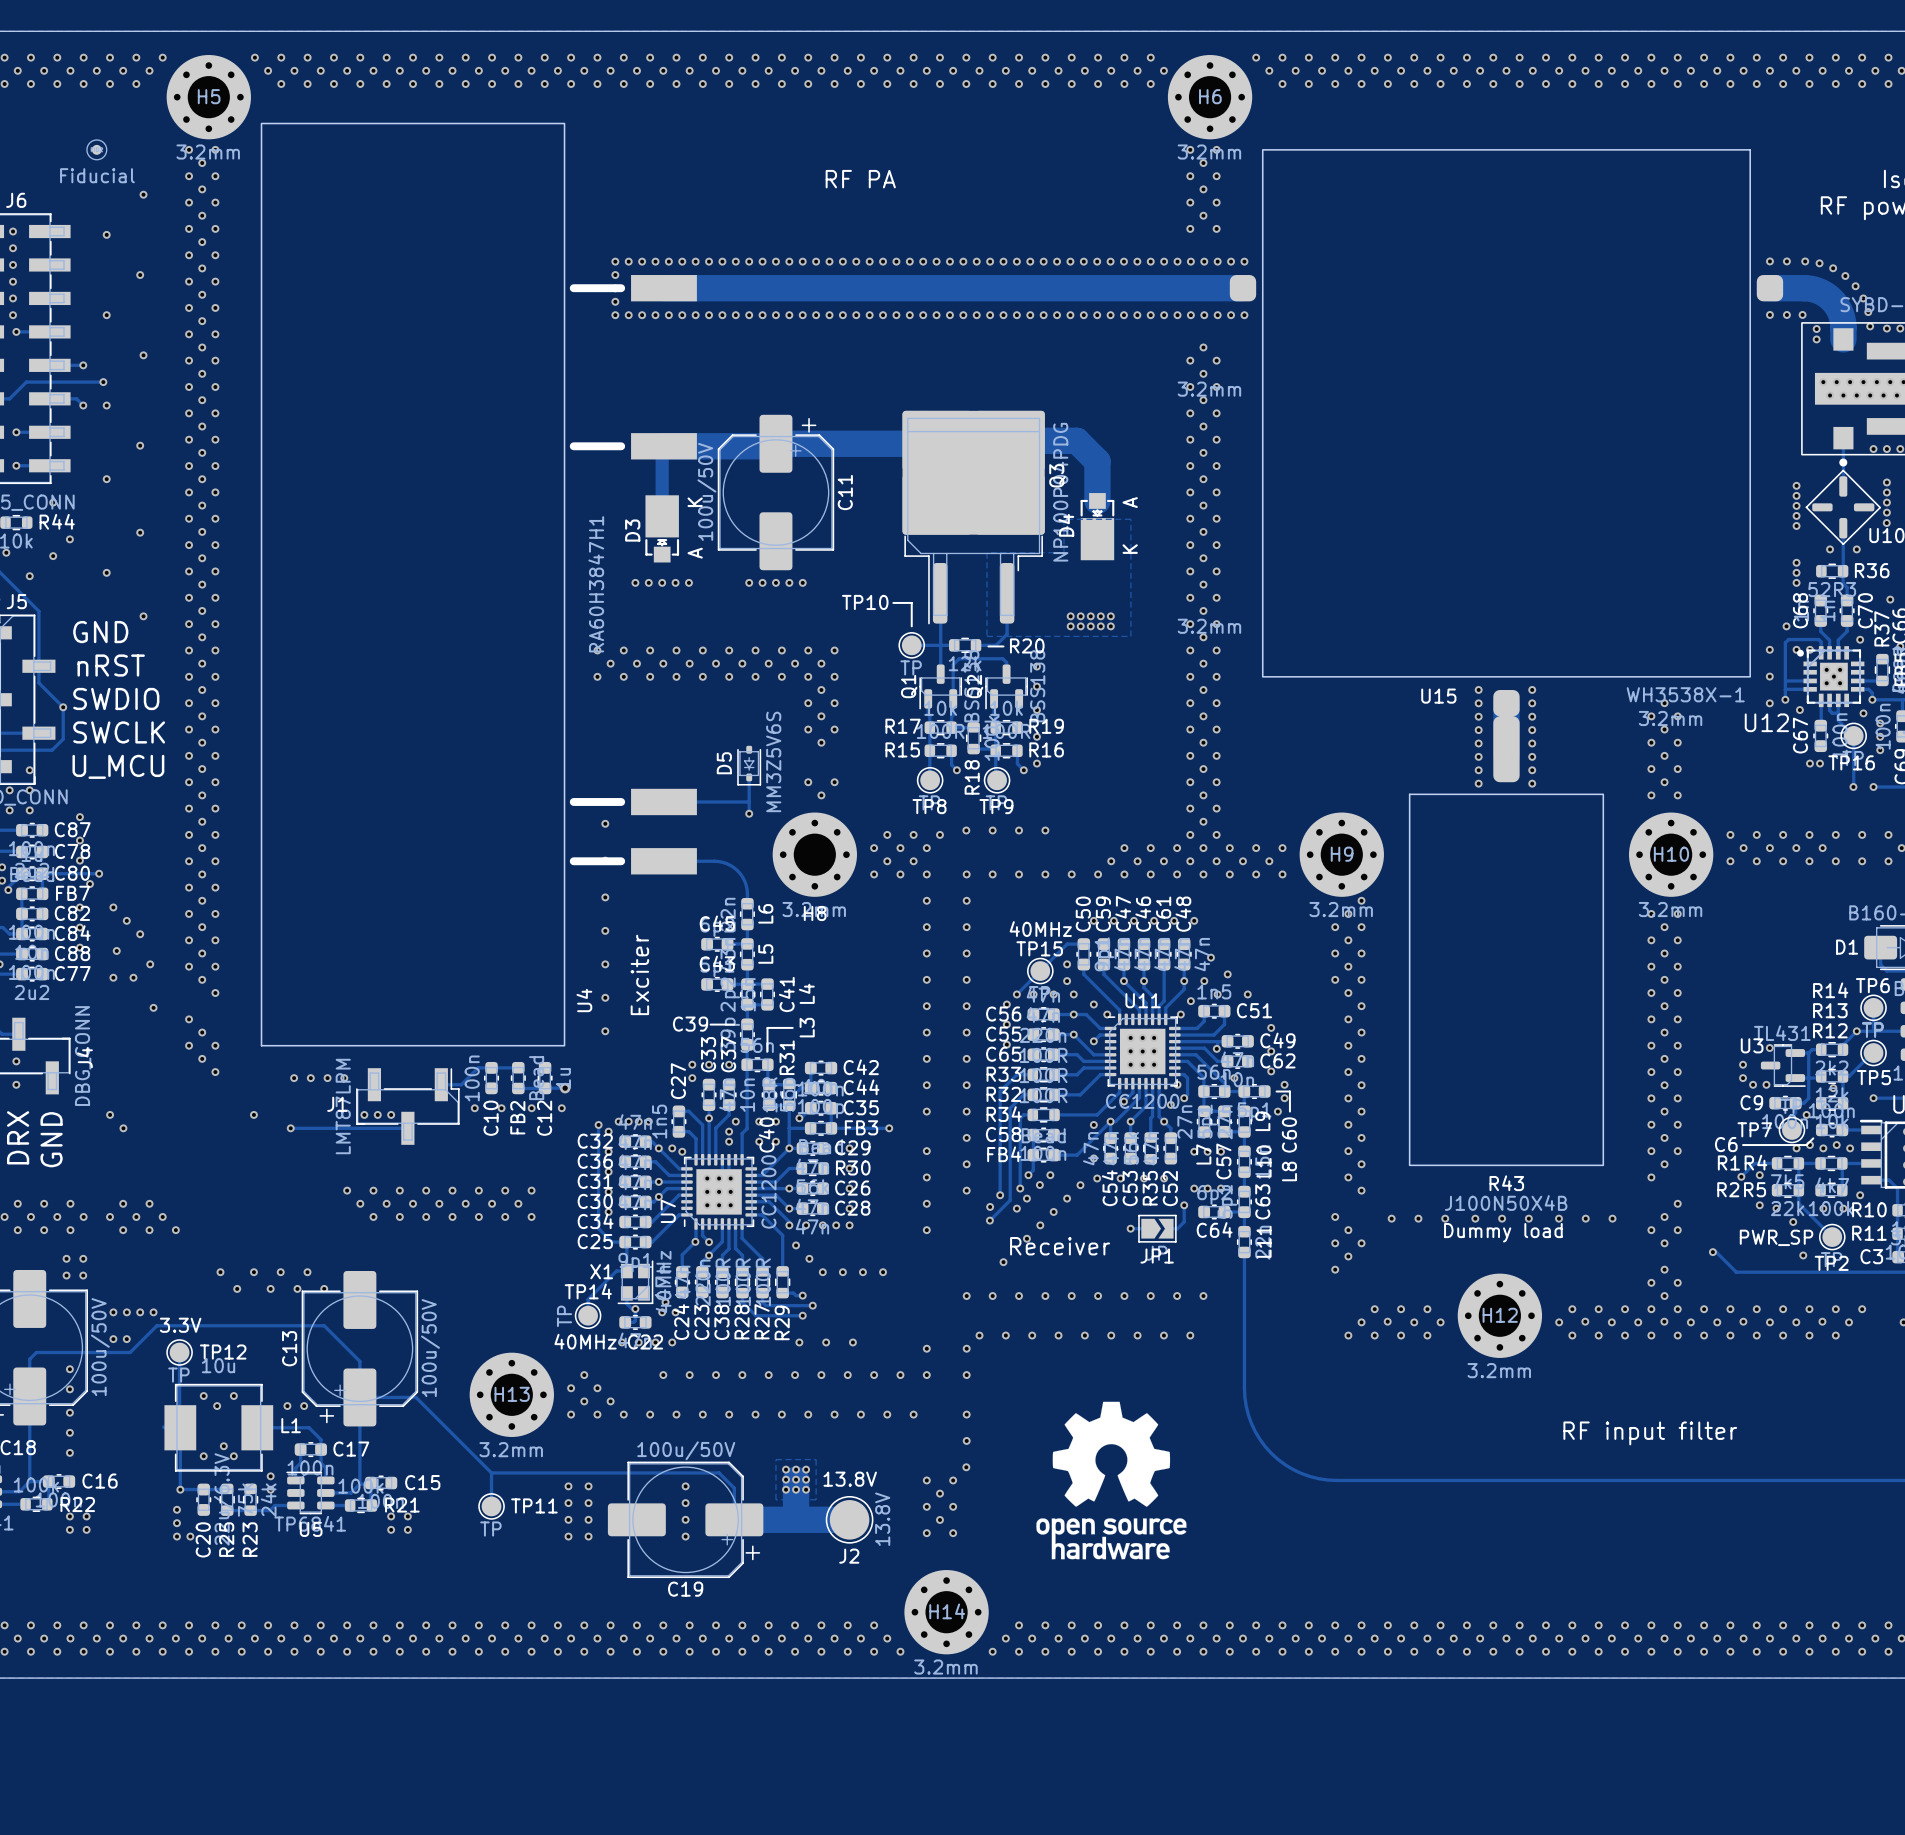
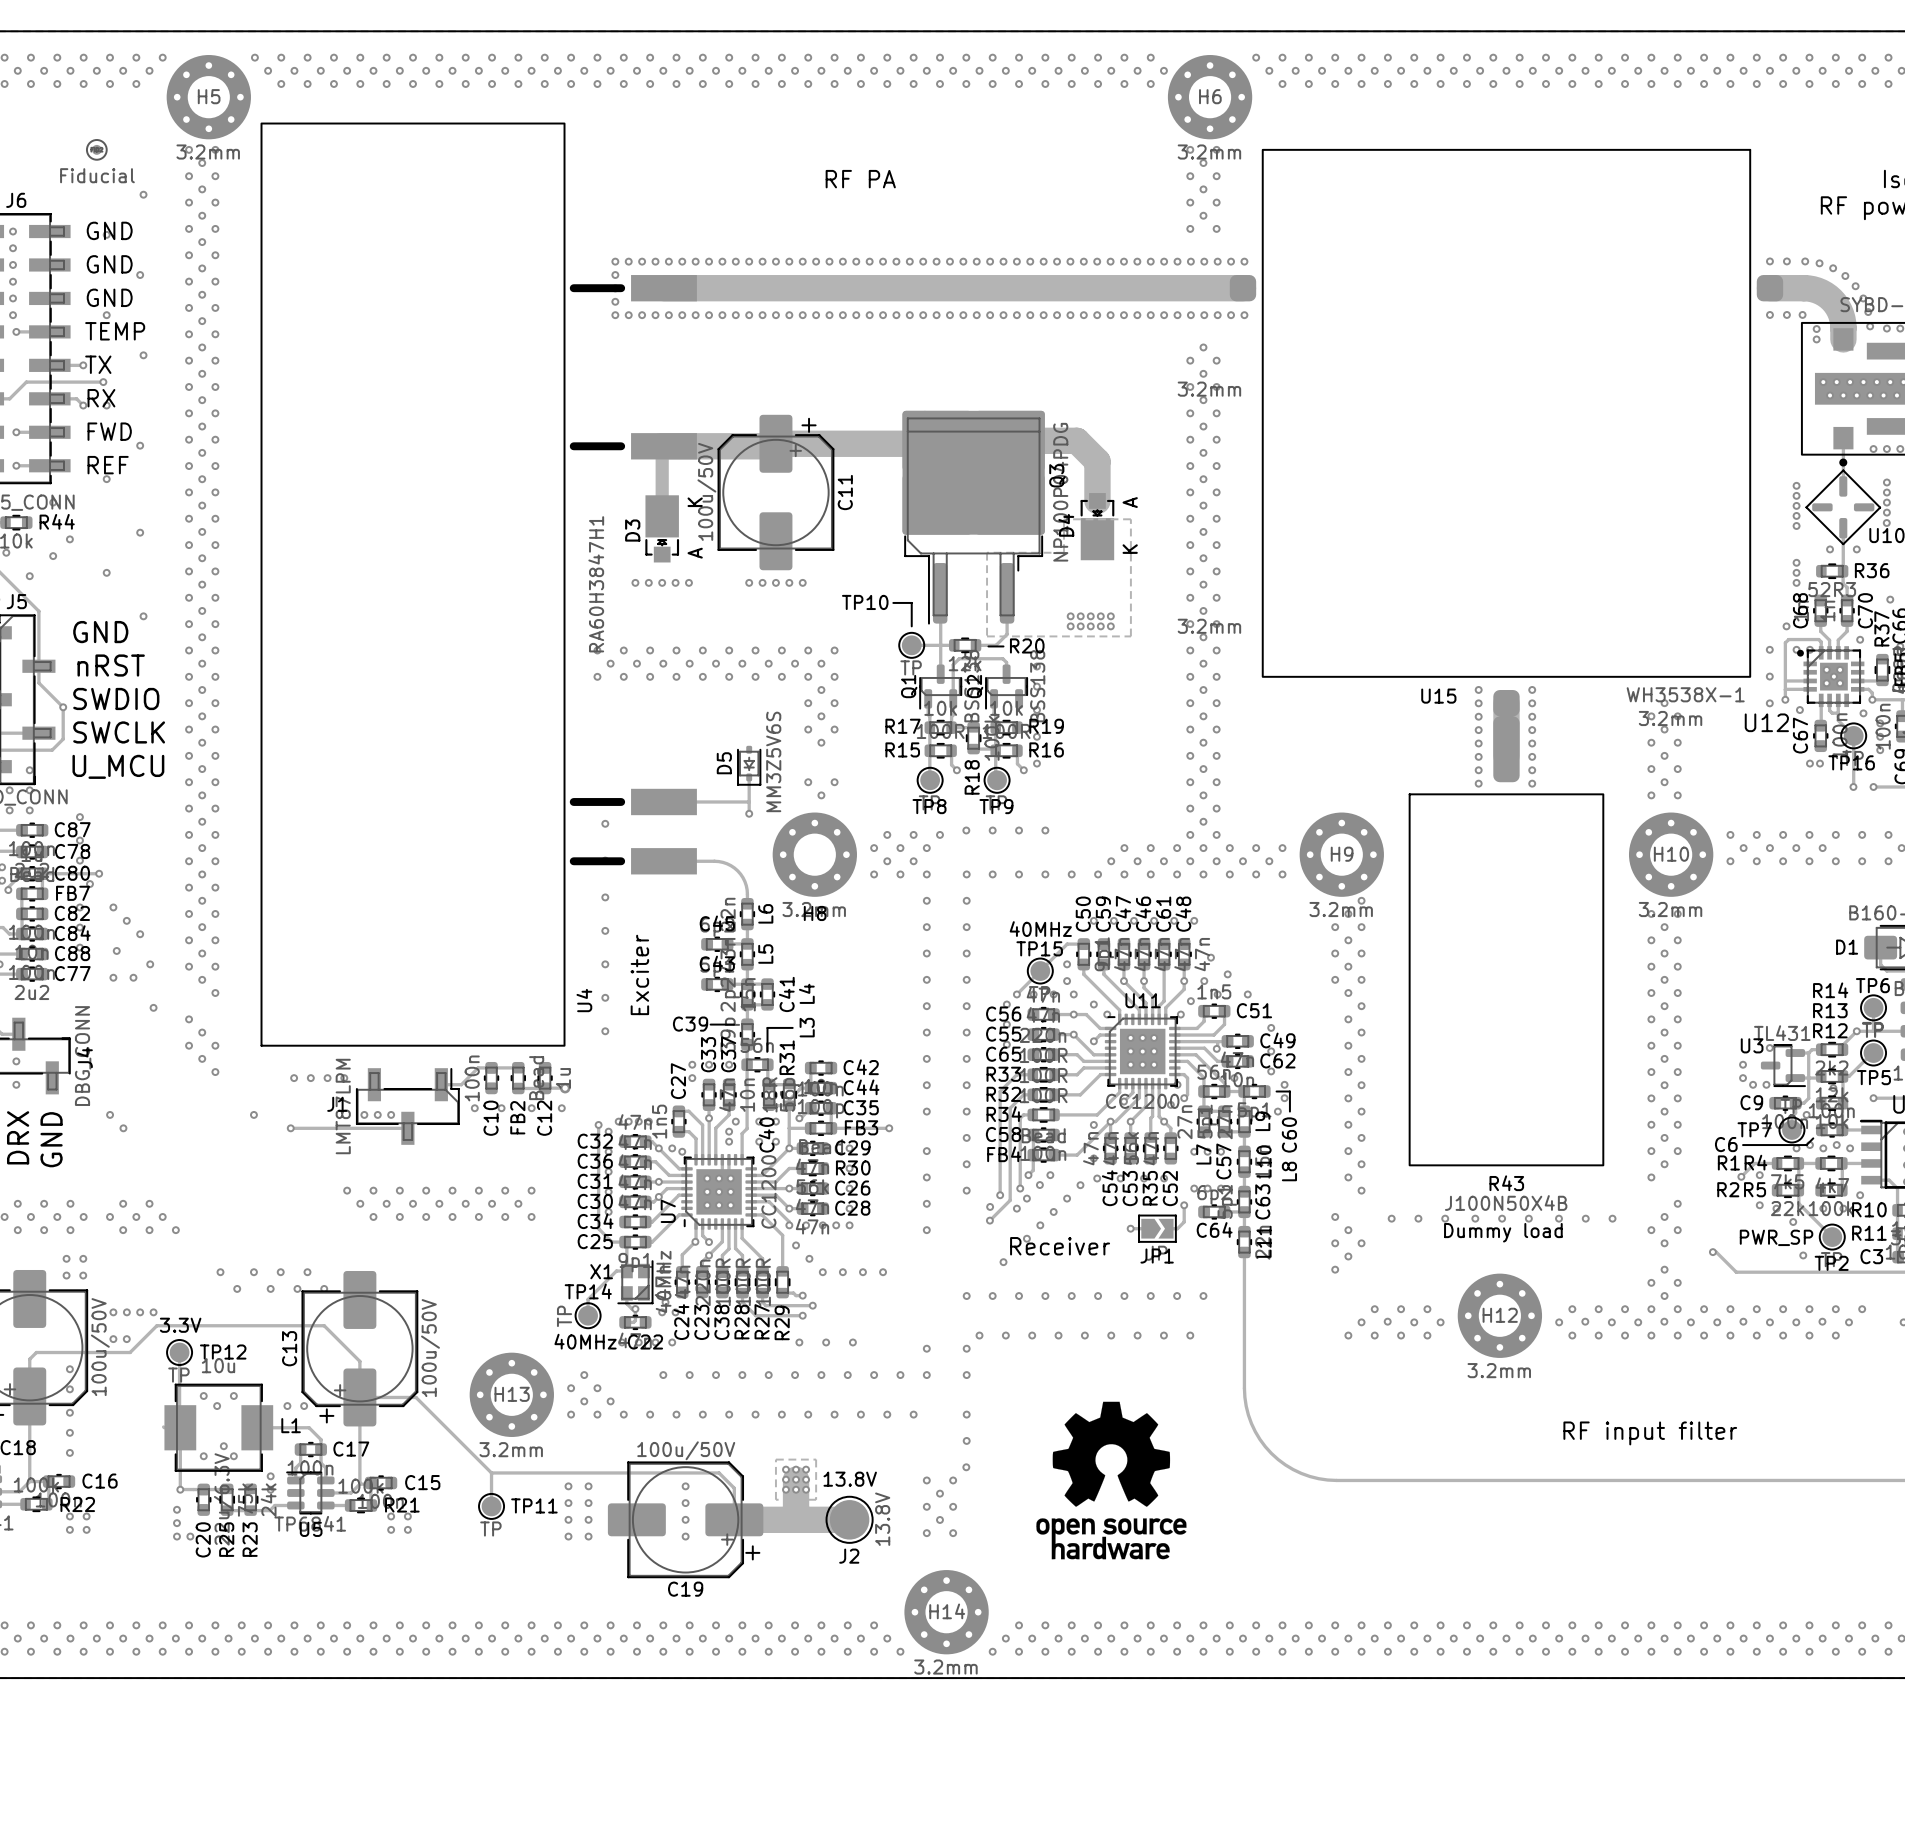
text: none -> GND (109, 230)
text: none -> GND (109, 264)
text: none -> GND (109, 297)
text: none -> TEMP (115, 331)
text: none -> TX (98, 364)
text: none -> RX (101, 398)
text: none -> FWD (109, 431)
text: none -> REF (108, 465)

